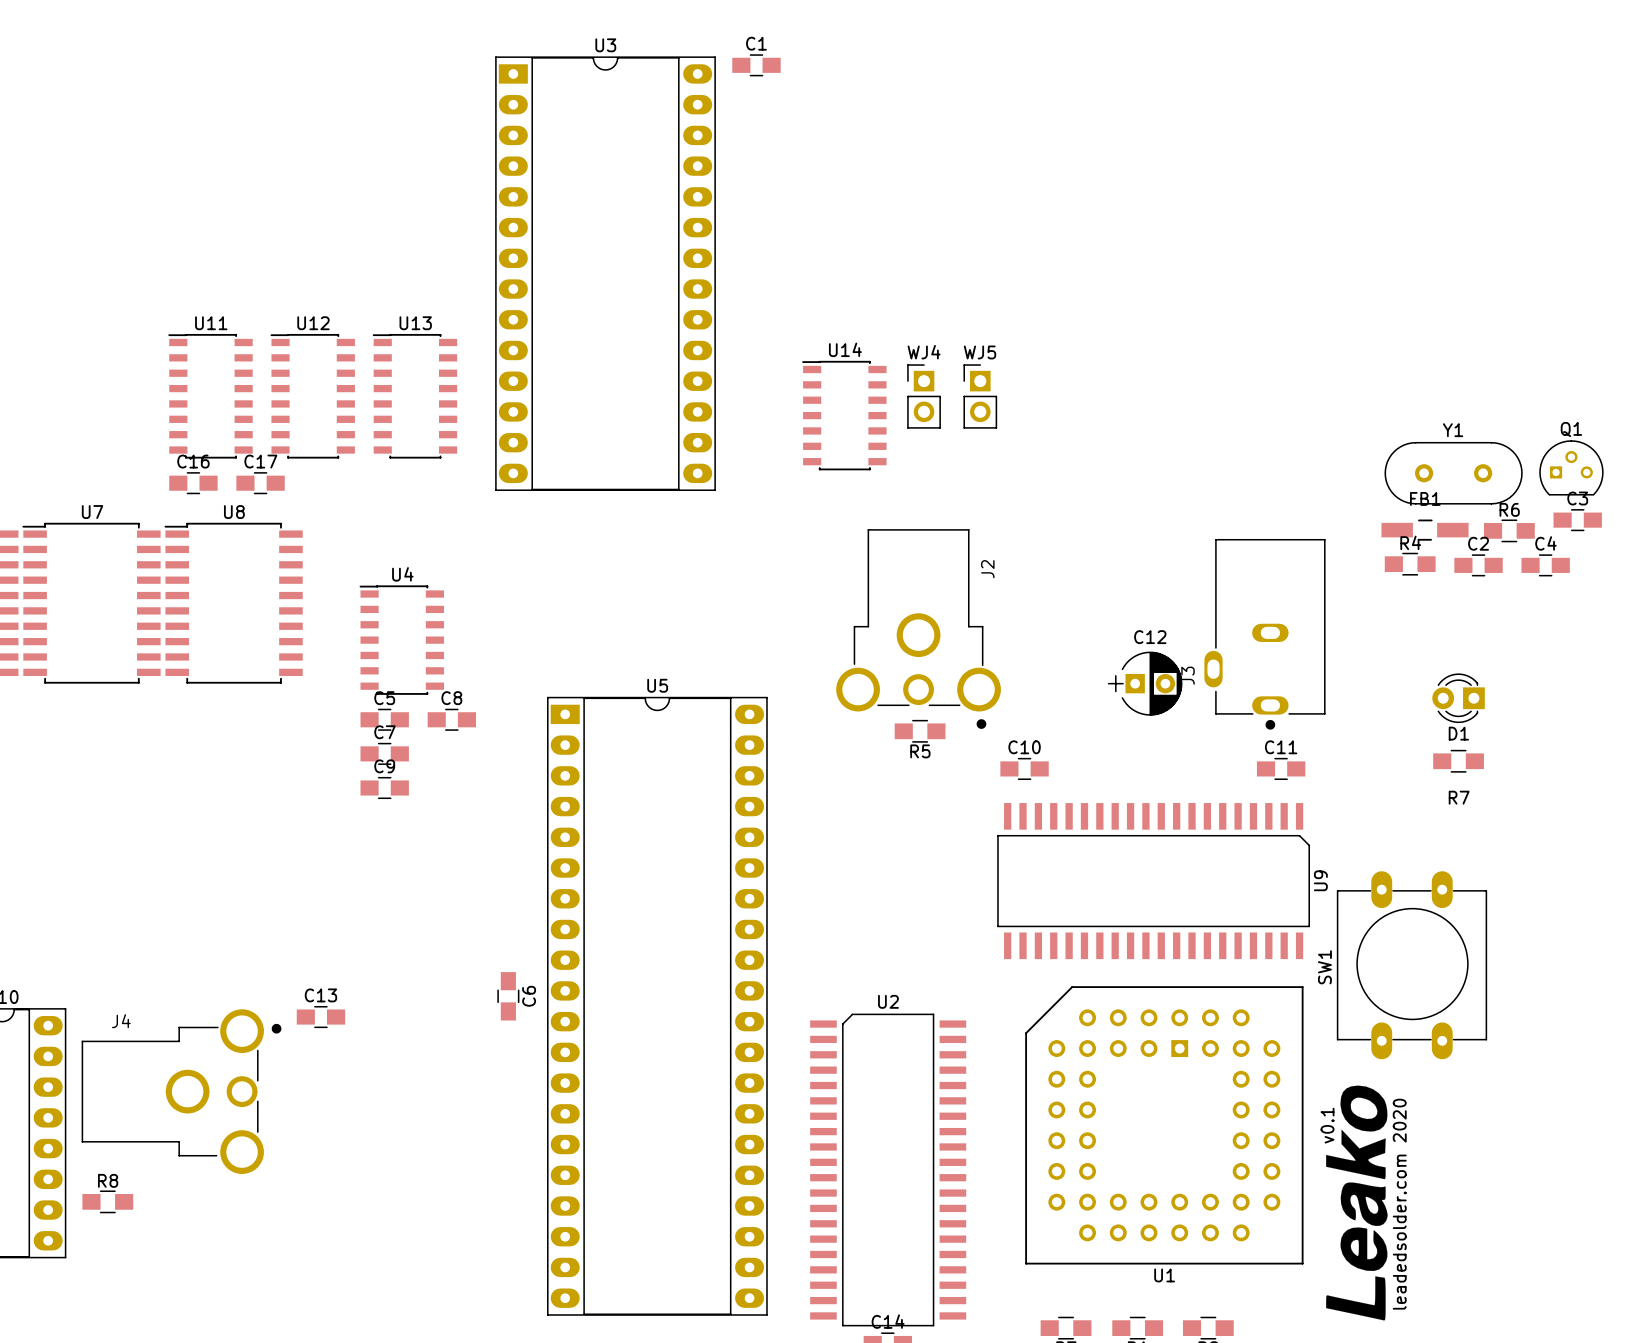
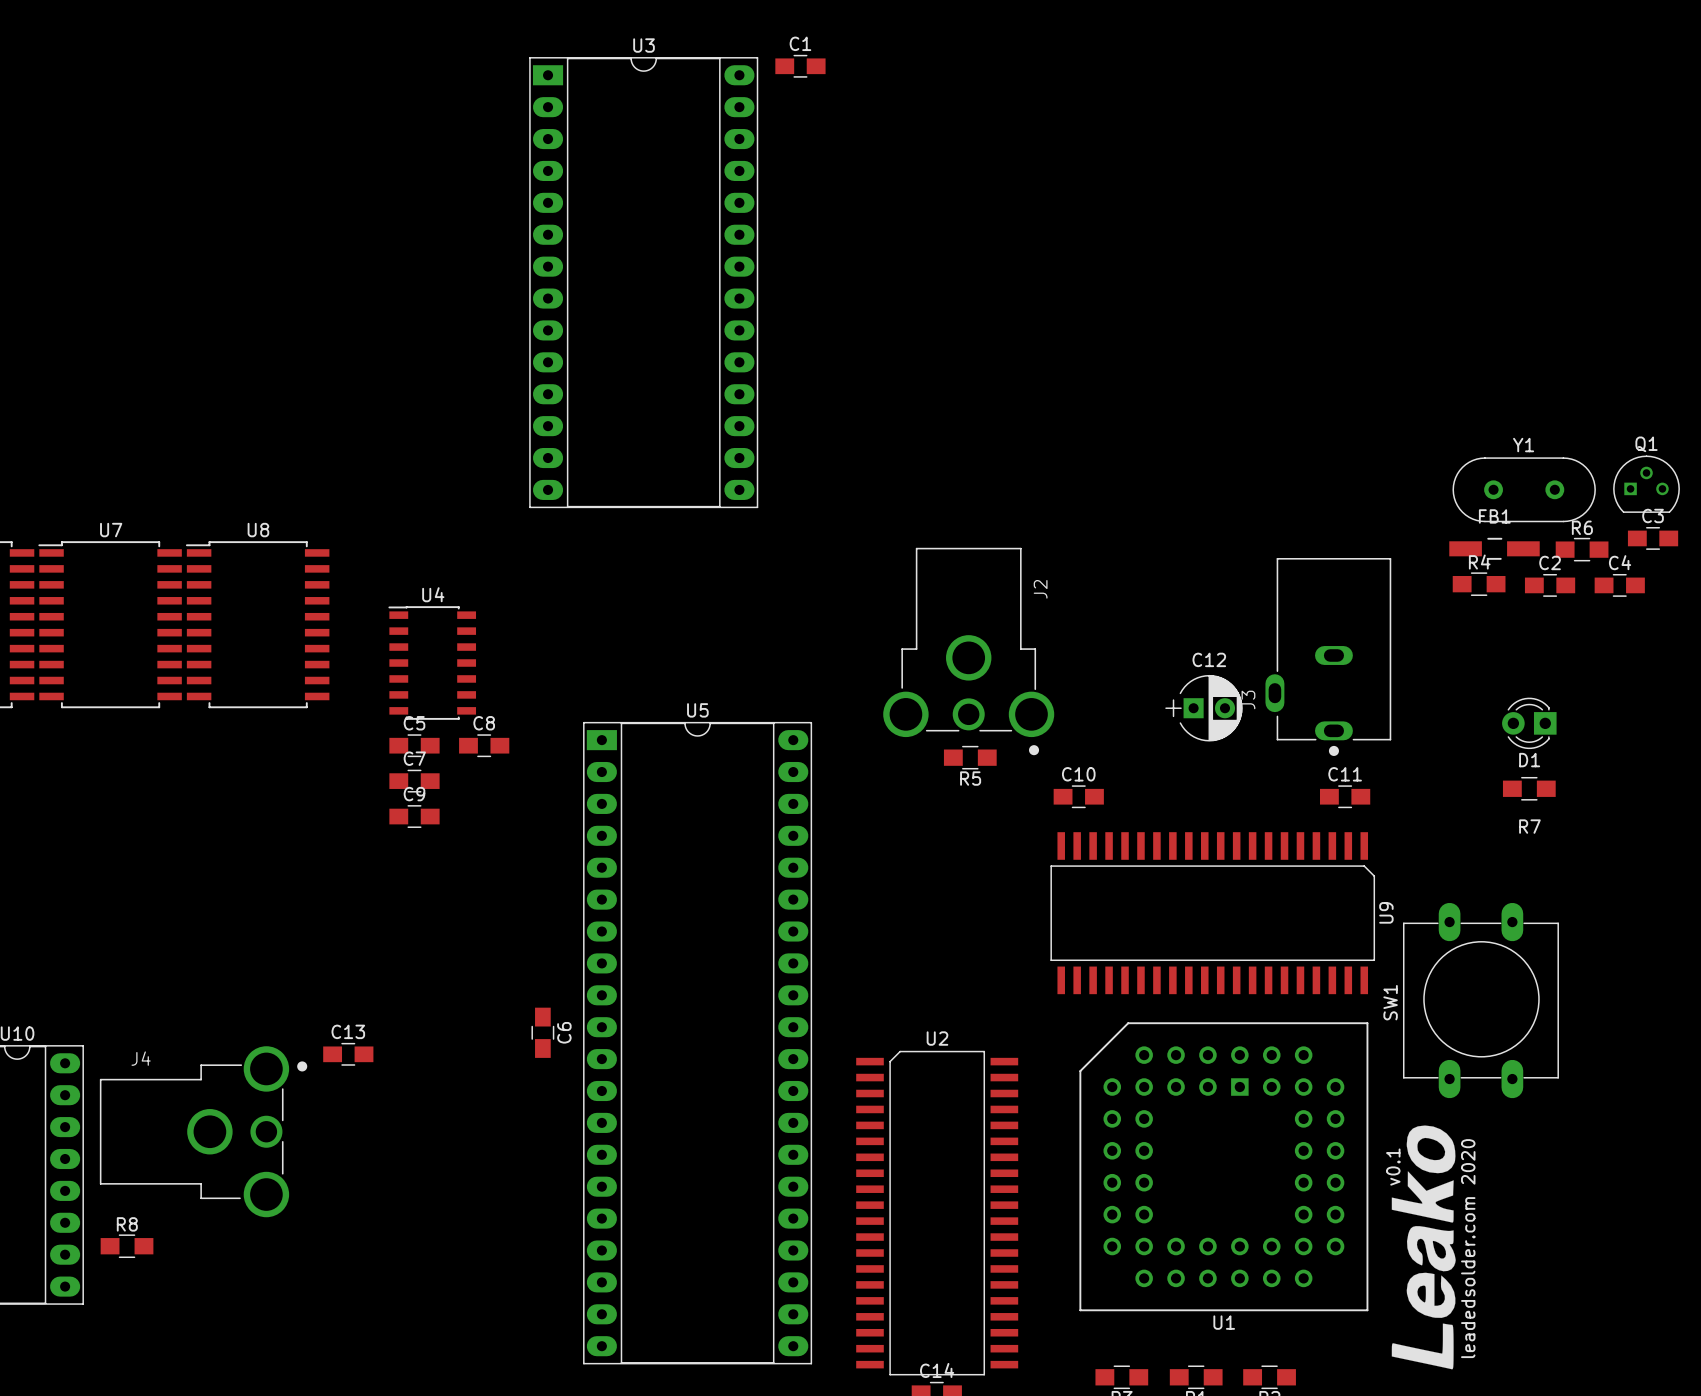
U11: (210, 396) -> none
U12: (312, 396) -> none
U13: (414, 396) -> none
WJ4: (924, 396) -> none
WJ5: (980, 396) -> none
U14: (844, 415) -> none
C16: (193, 483) -> none
C17: (260, 483) -> none

